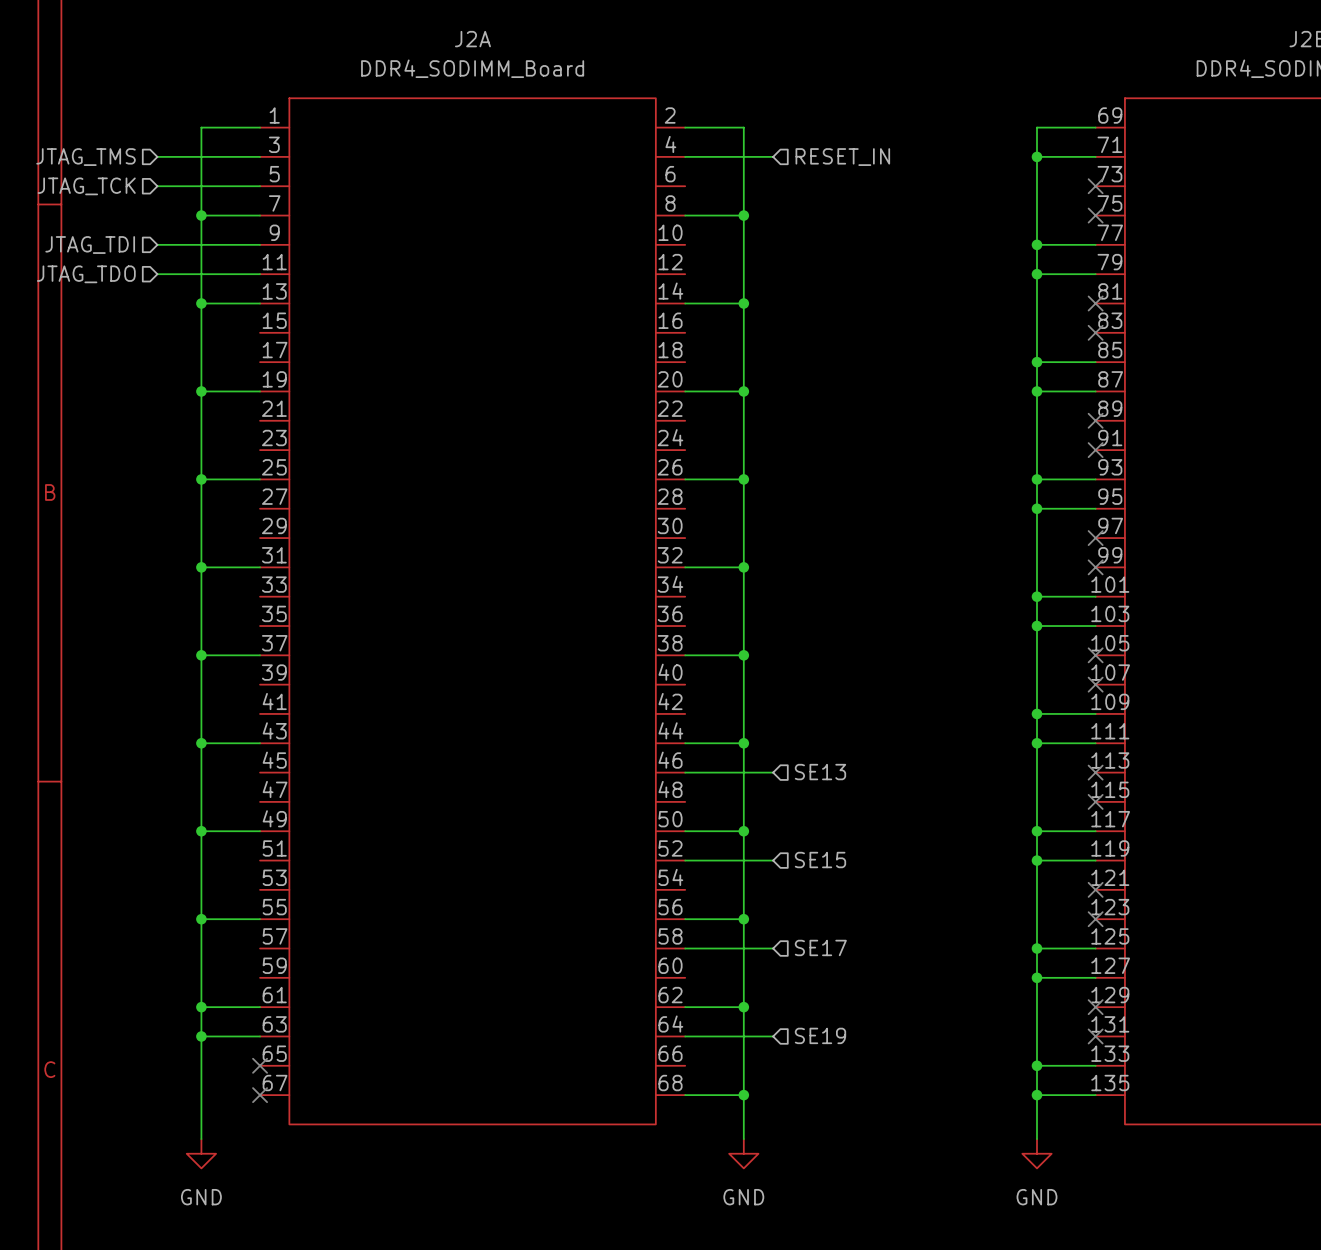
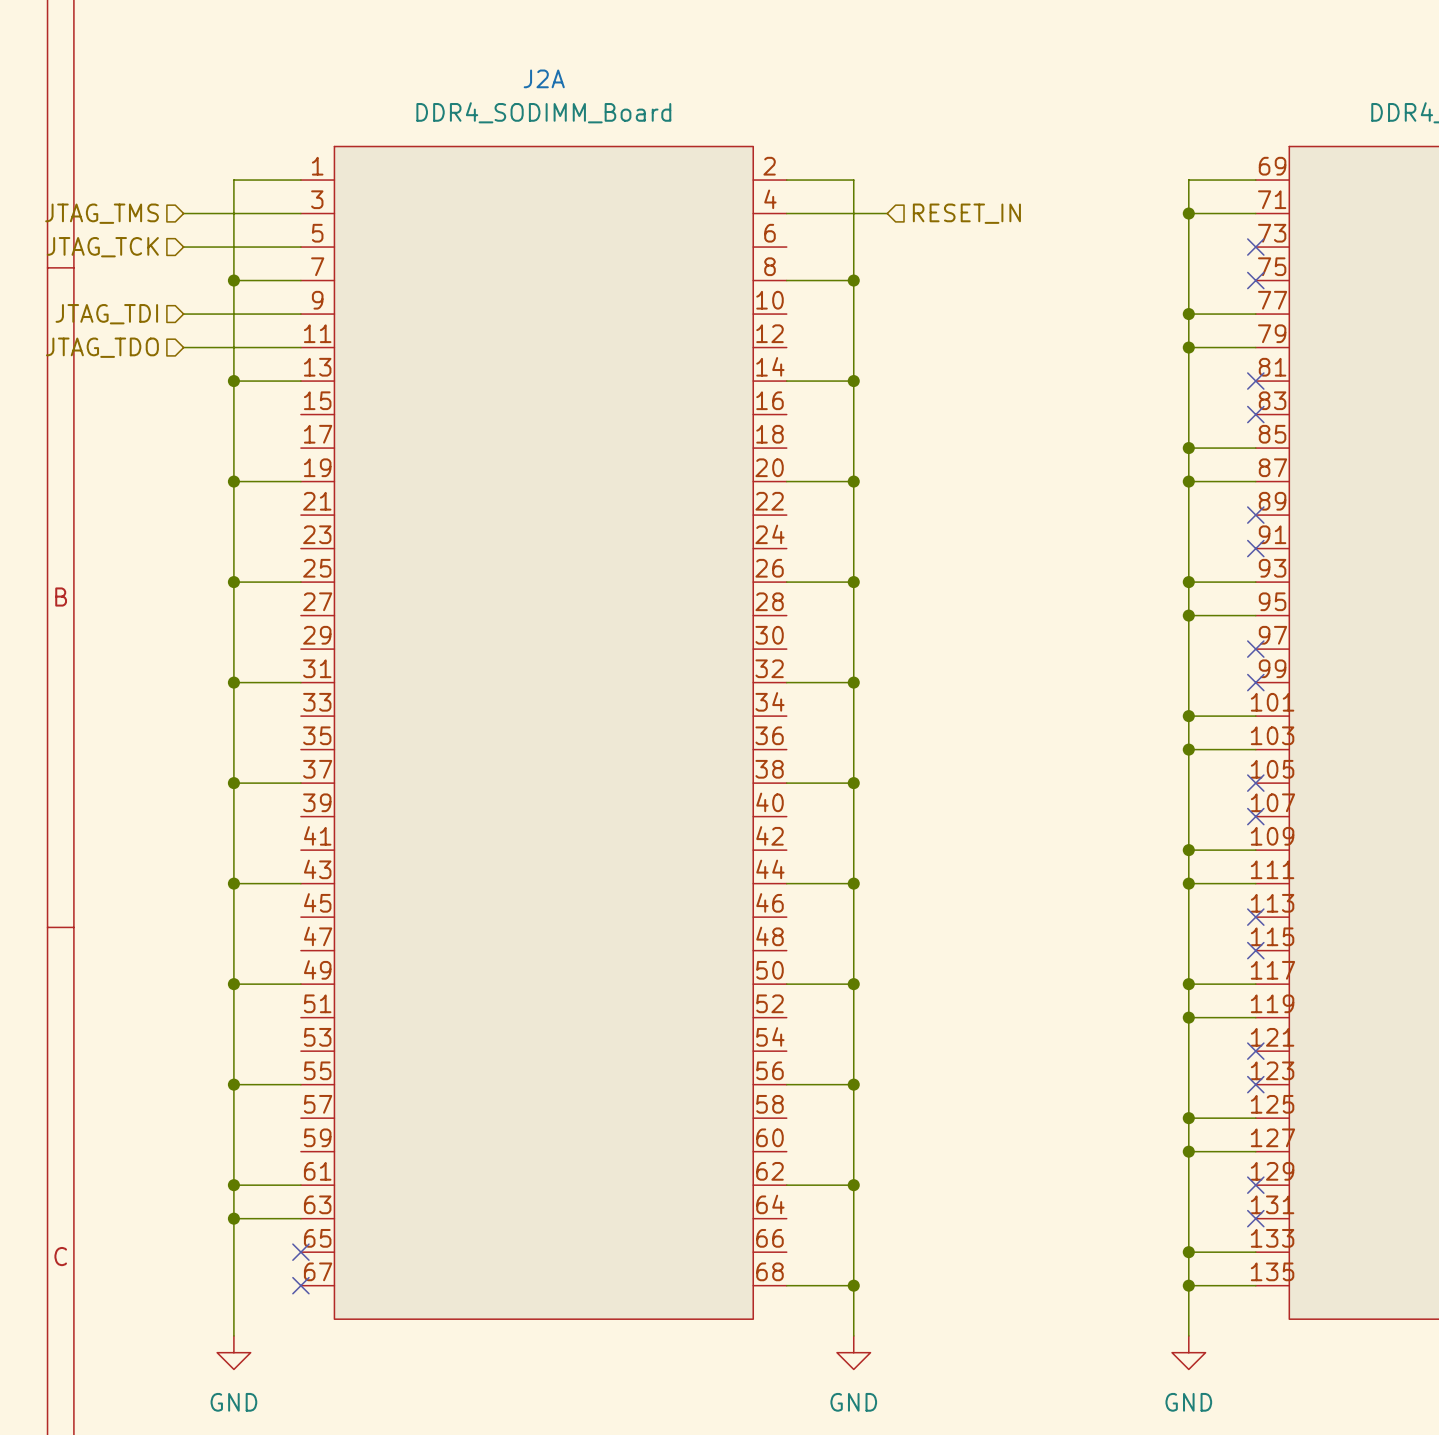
wire: (685, 772) (773, 772) -> none
hierarchical label: SE13 (820, 772) -> none
wire: (685, 860) (773, 860) -> none
hierarchical label: SE15 (820, 860) -> none
hierarchical label: SE17 (820, 947) -> none
wire: (685, 948) (773, 948) -> none
hierarchical label: SE19 (820, 1035) -> none
wire: (685, 1036) (773, 1036) -> none

